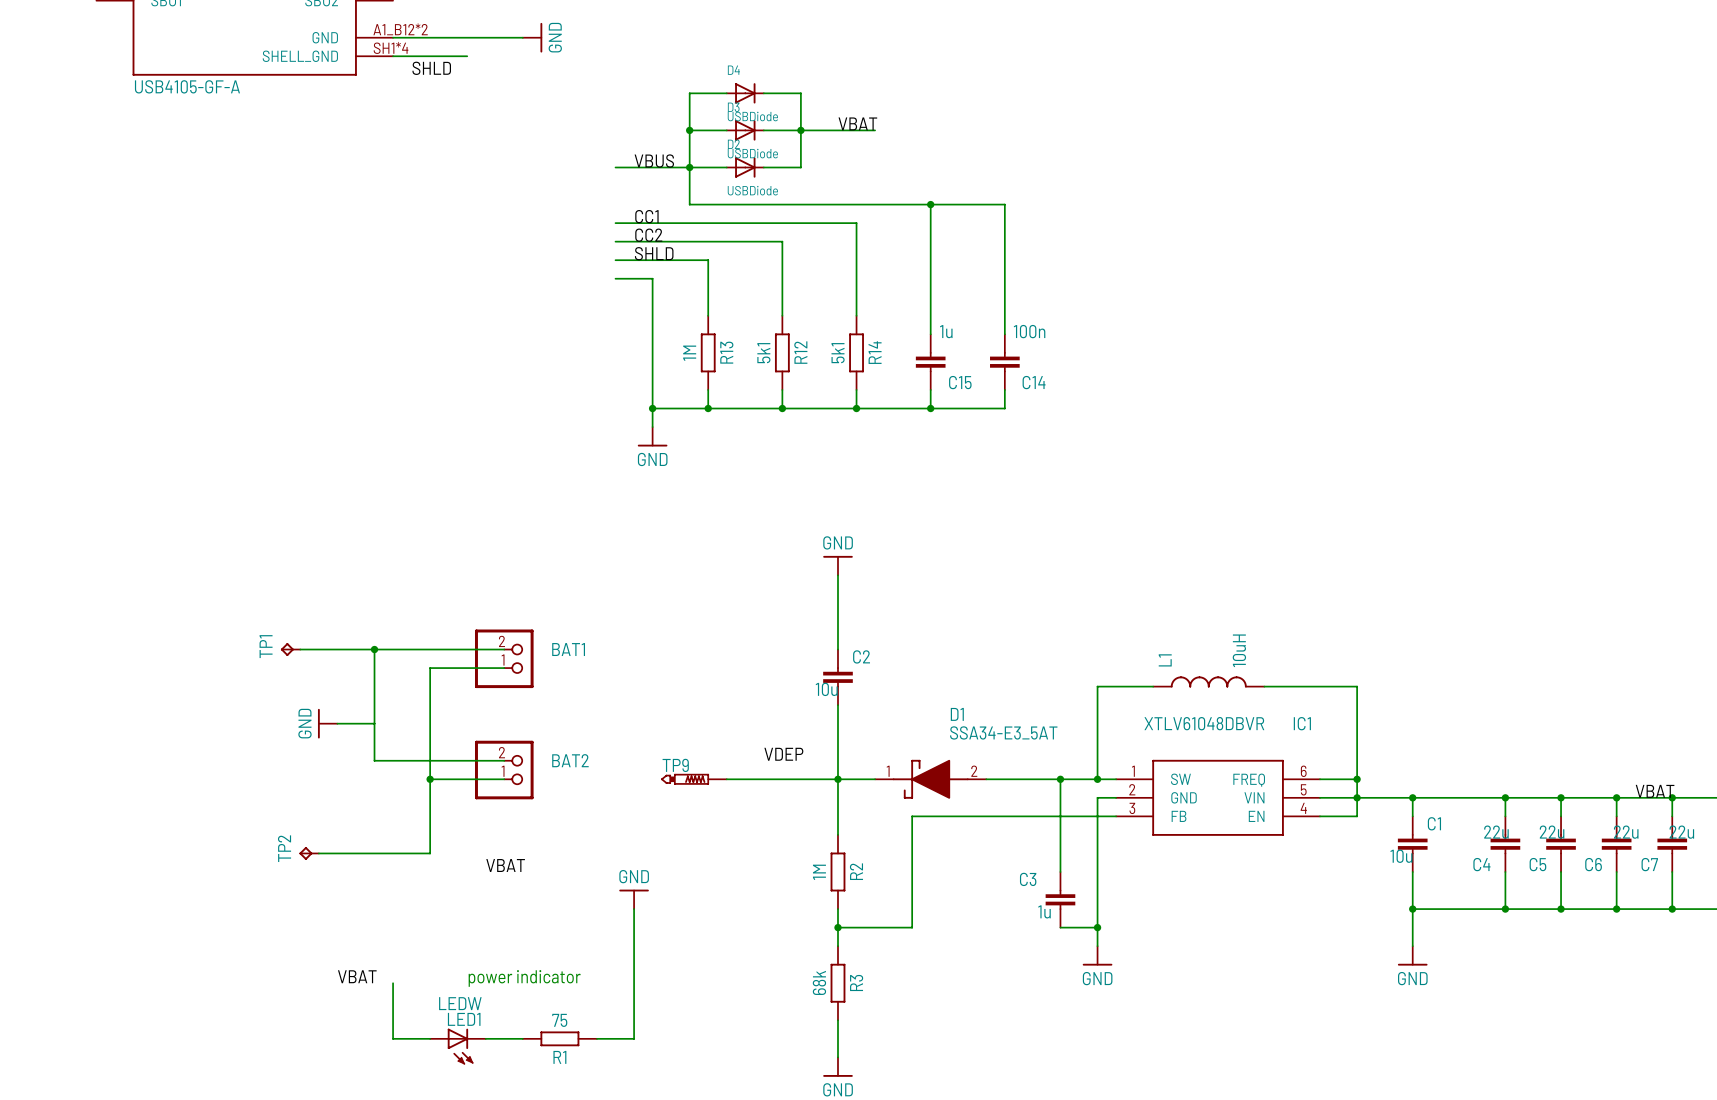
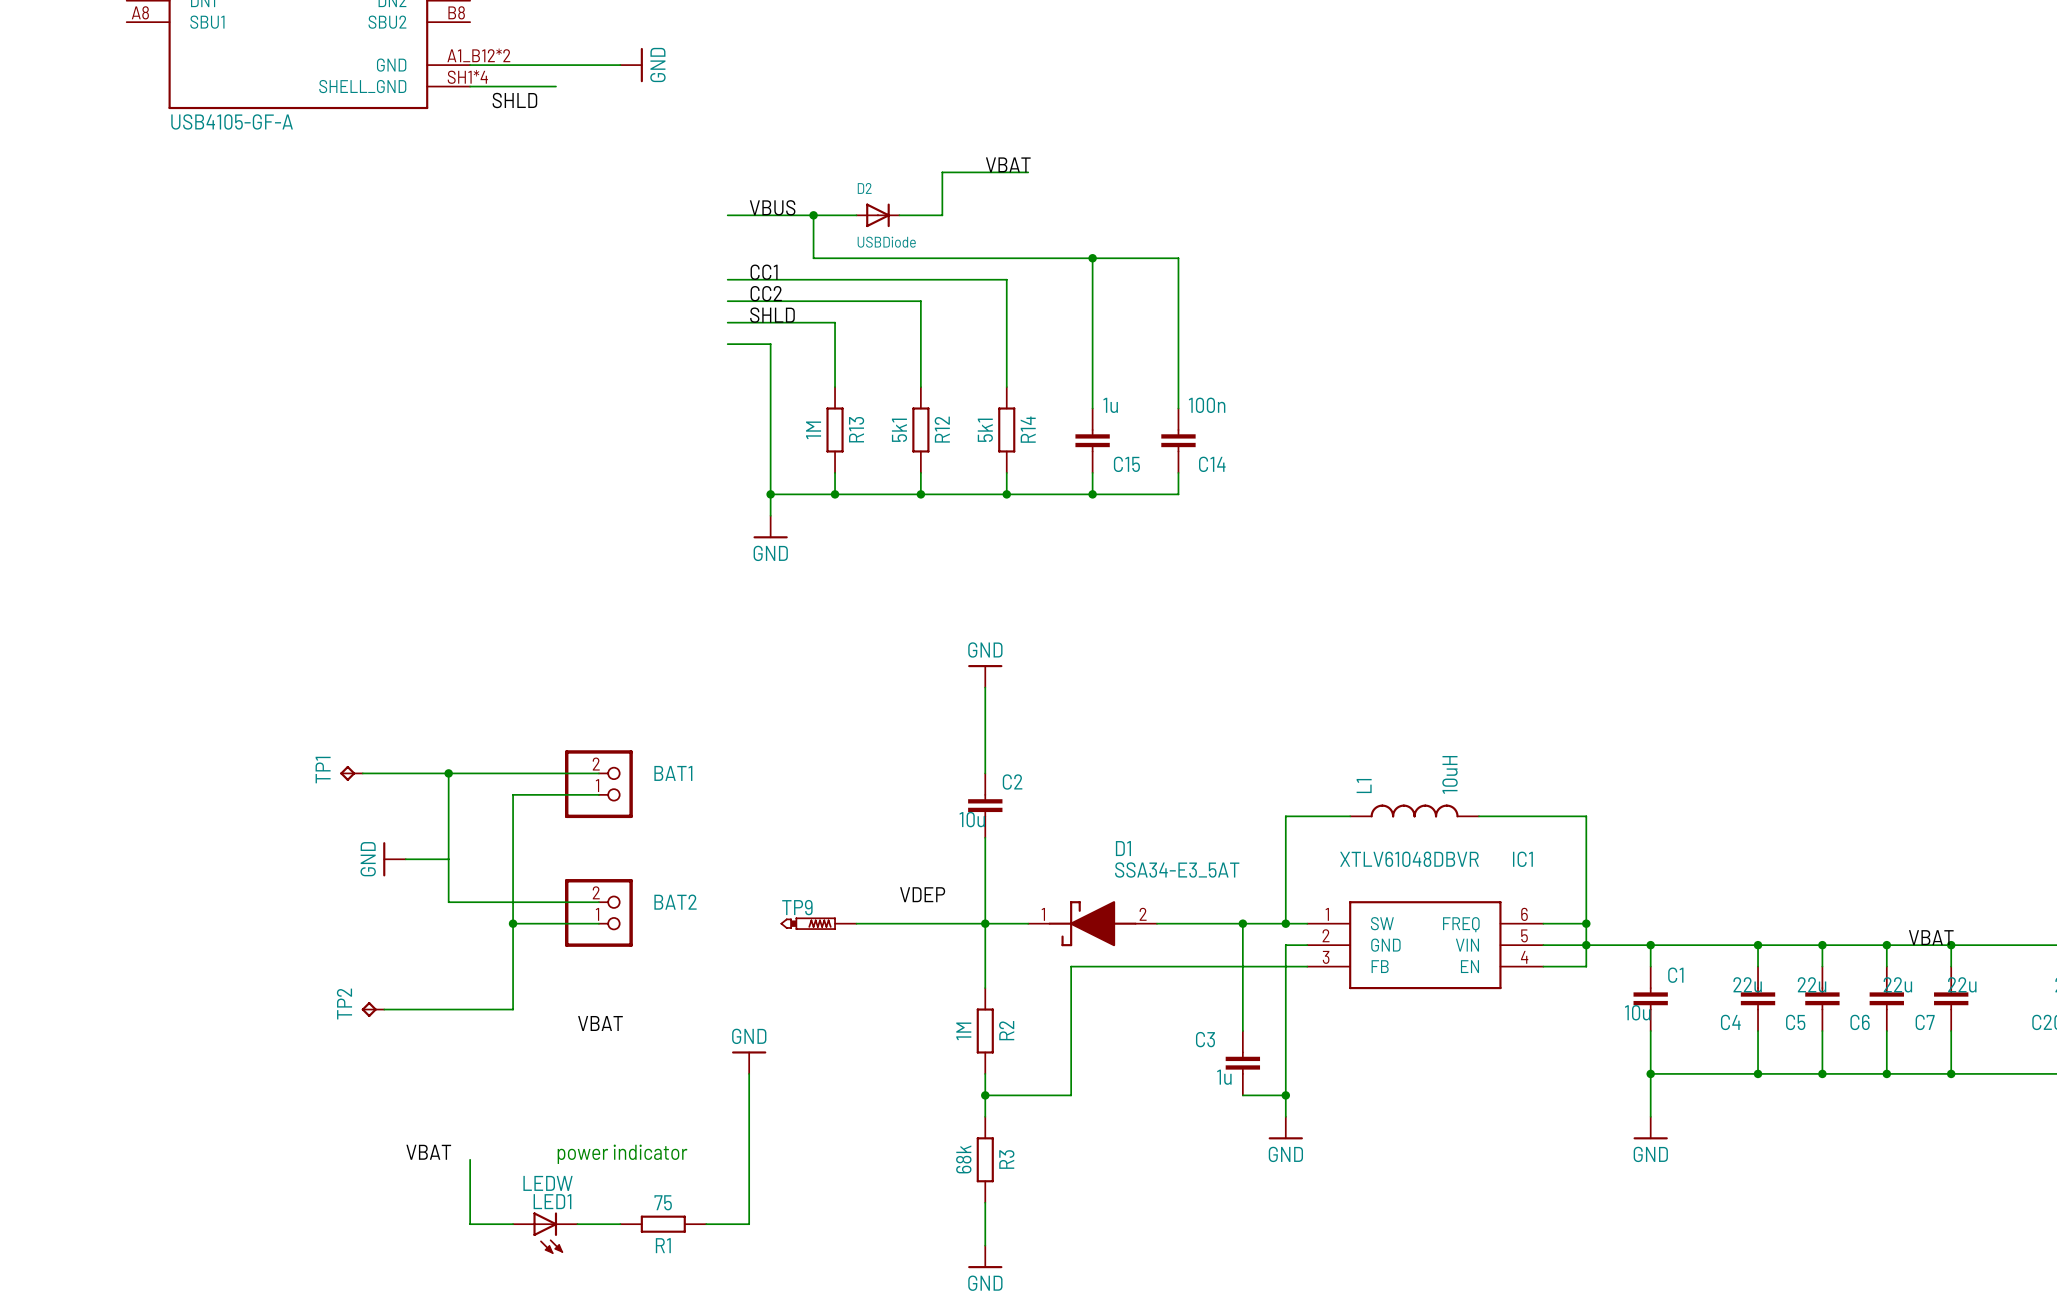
wire: (726, 93) (689, 93) (689, 167) -> none
D4: USBDiode (745, 93) -> none
wire: (763, 93) (800, 93) (800, 130) (763, 130) -> none
wire: (689, 130) (726, 130) -> none
junction: (689, 130) -> none
D3: USBDiode (745, 130) -> none
junction: (800, 130) -> none

